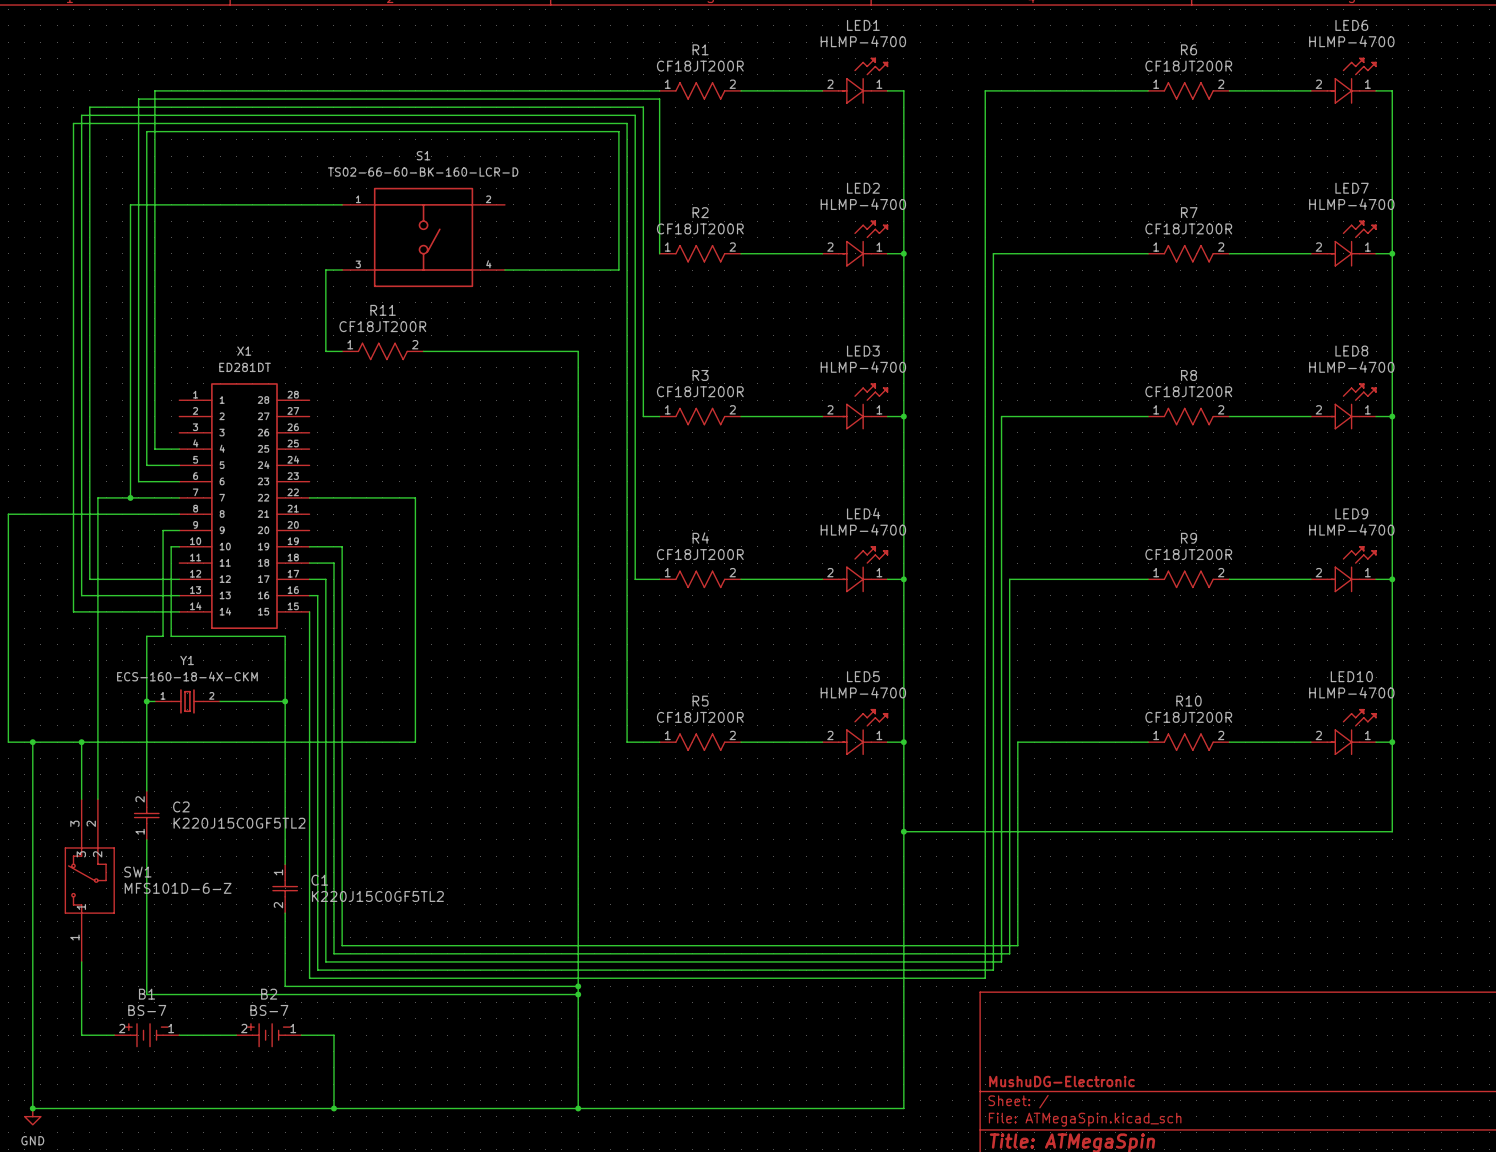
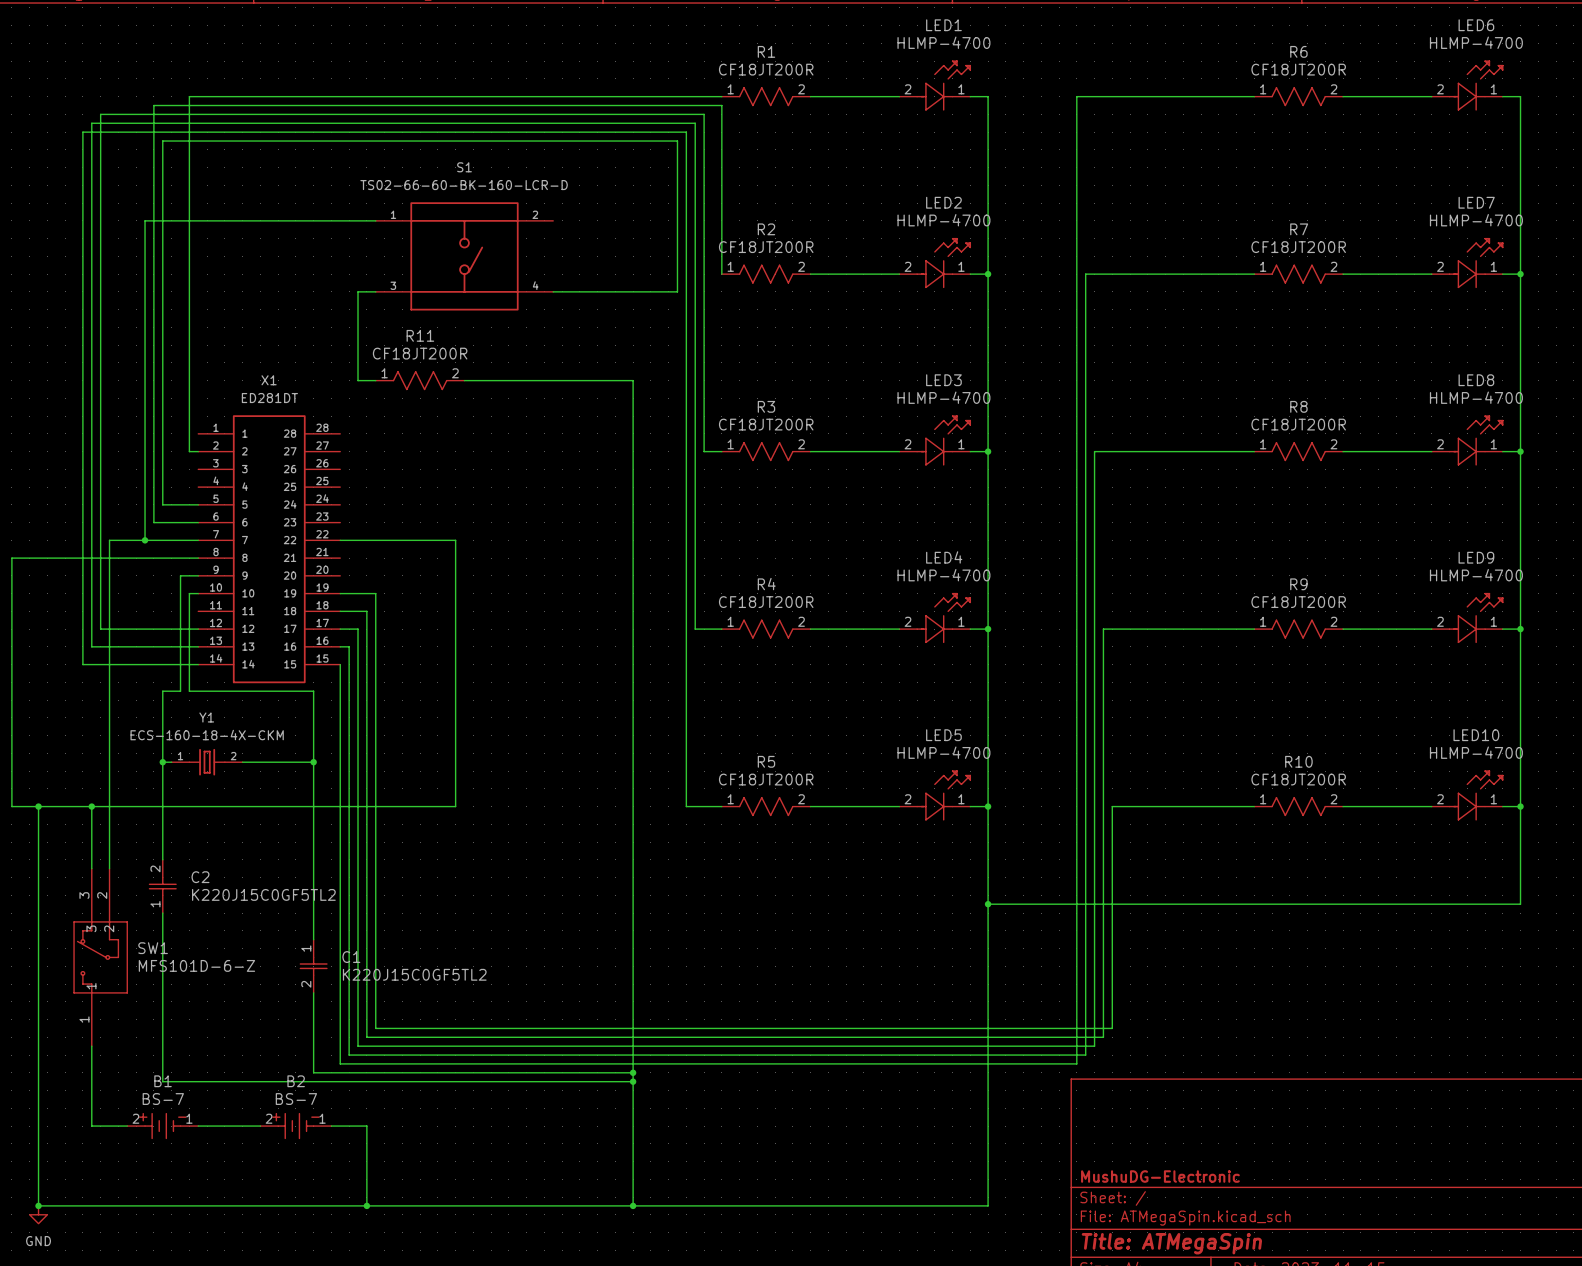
wire: (171, 90) (154, 90) (154, 449) (179, 449) -> (189, 96) (189, 451) (198, 451)

